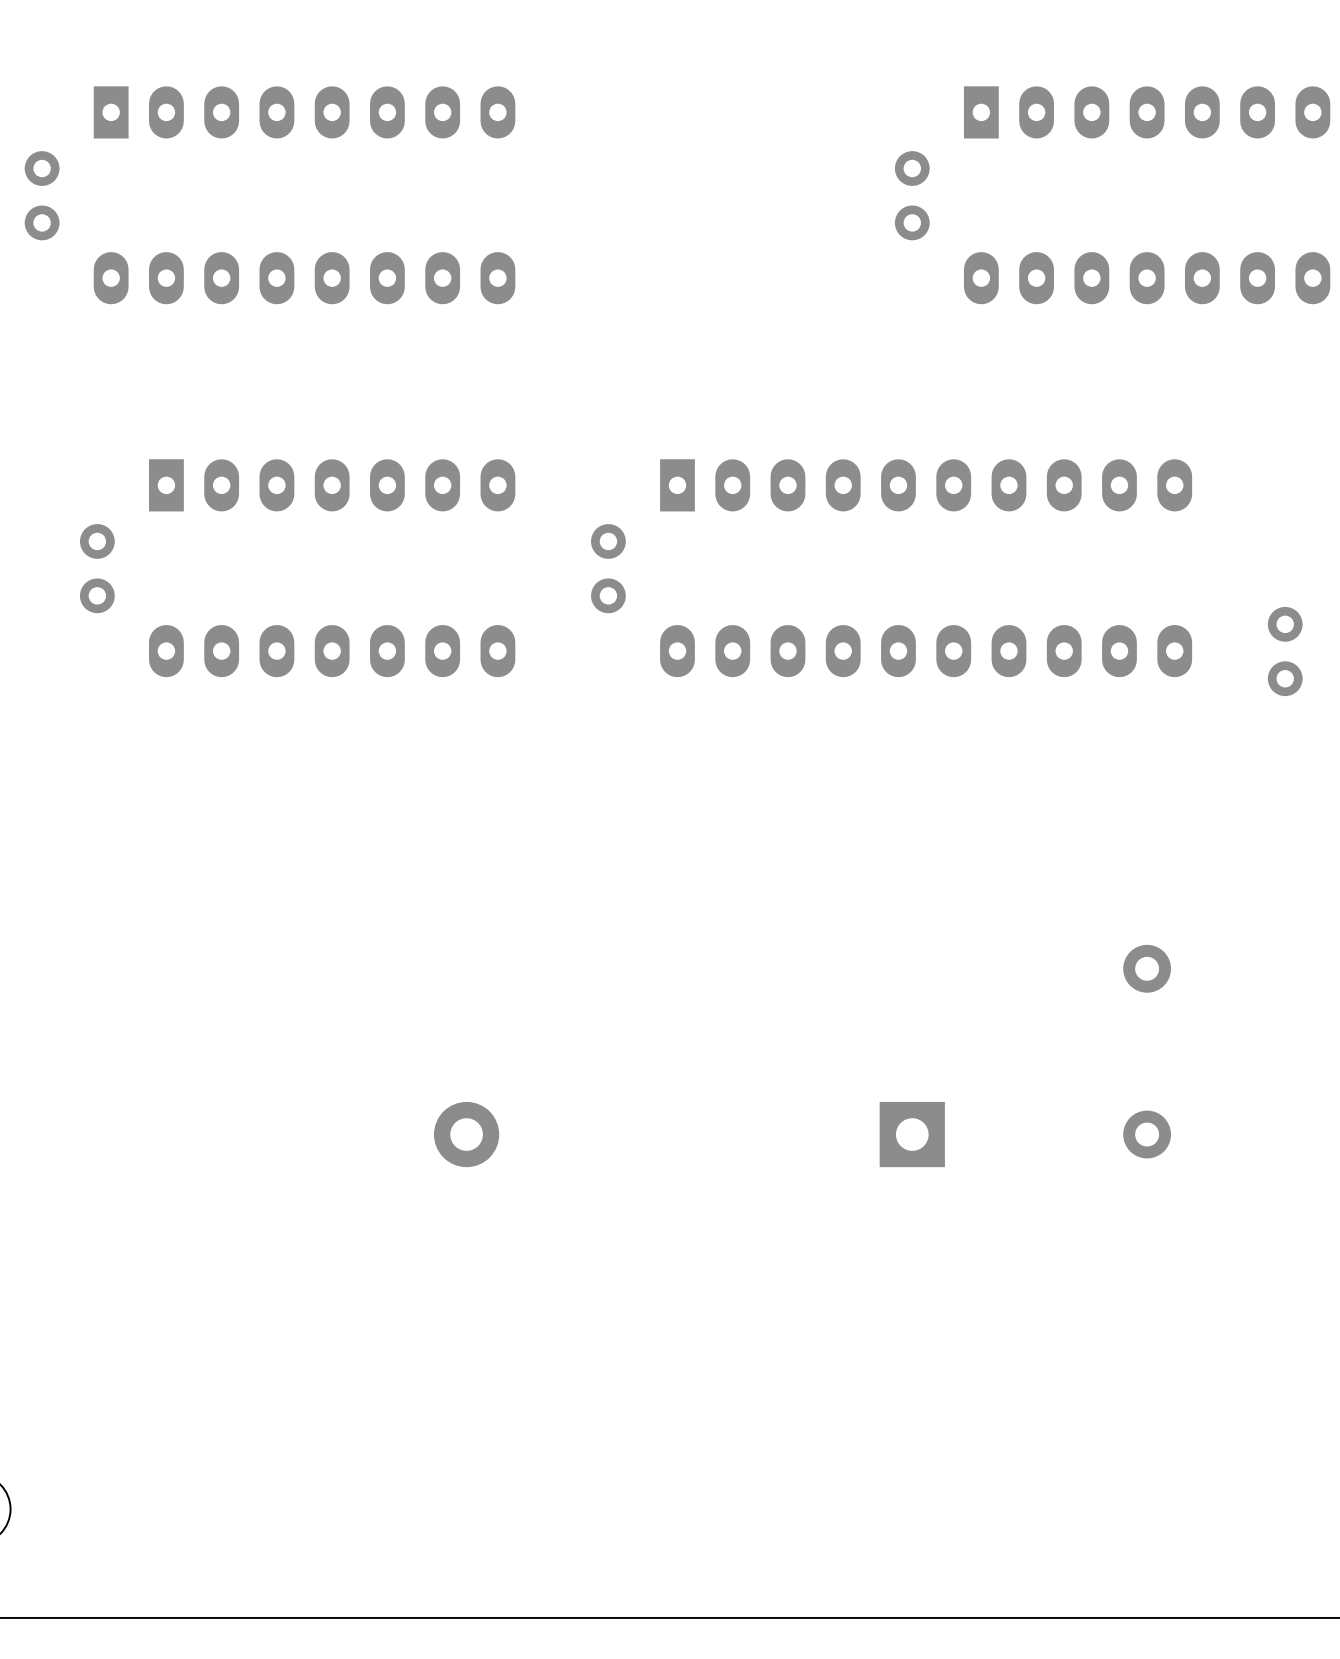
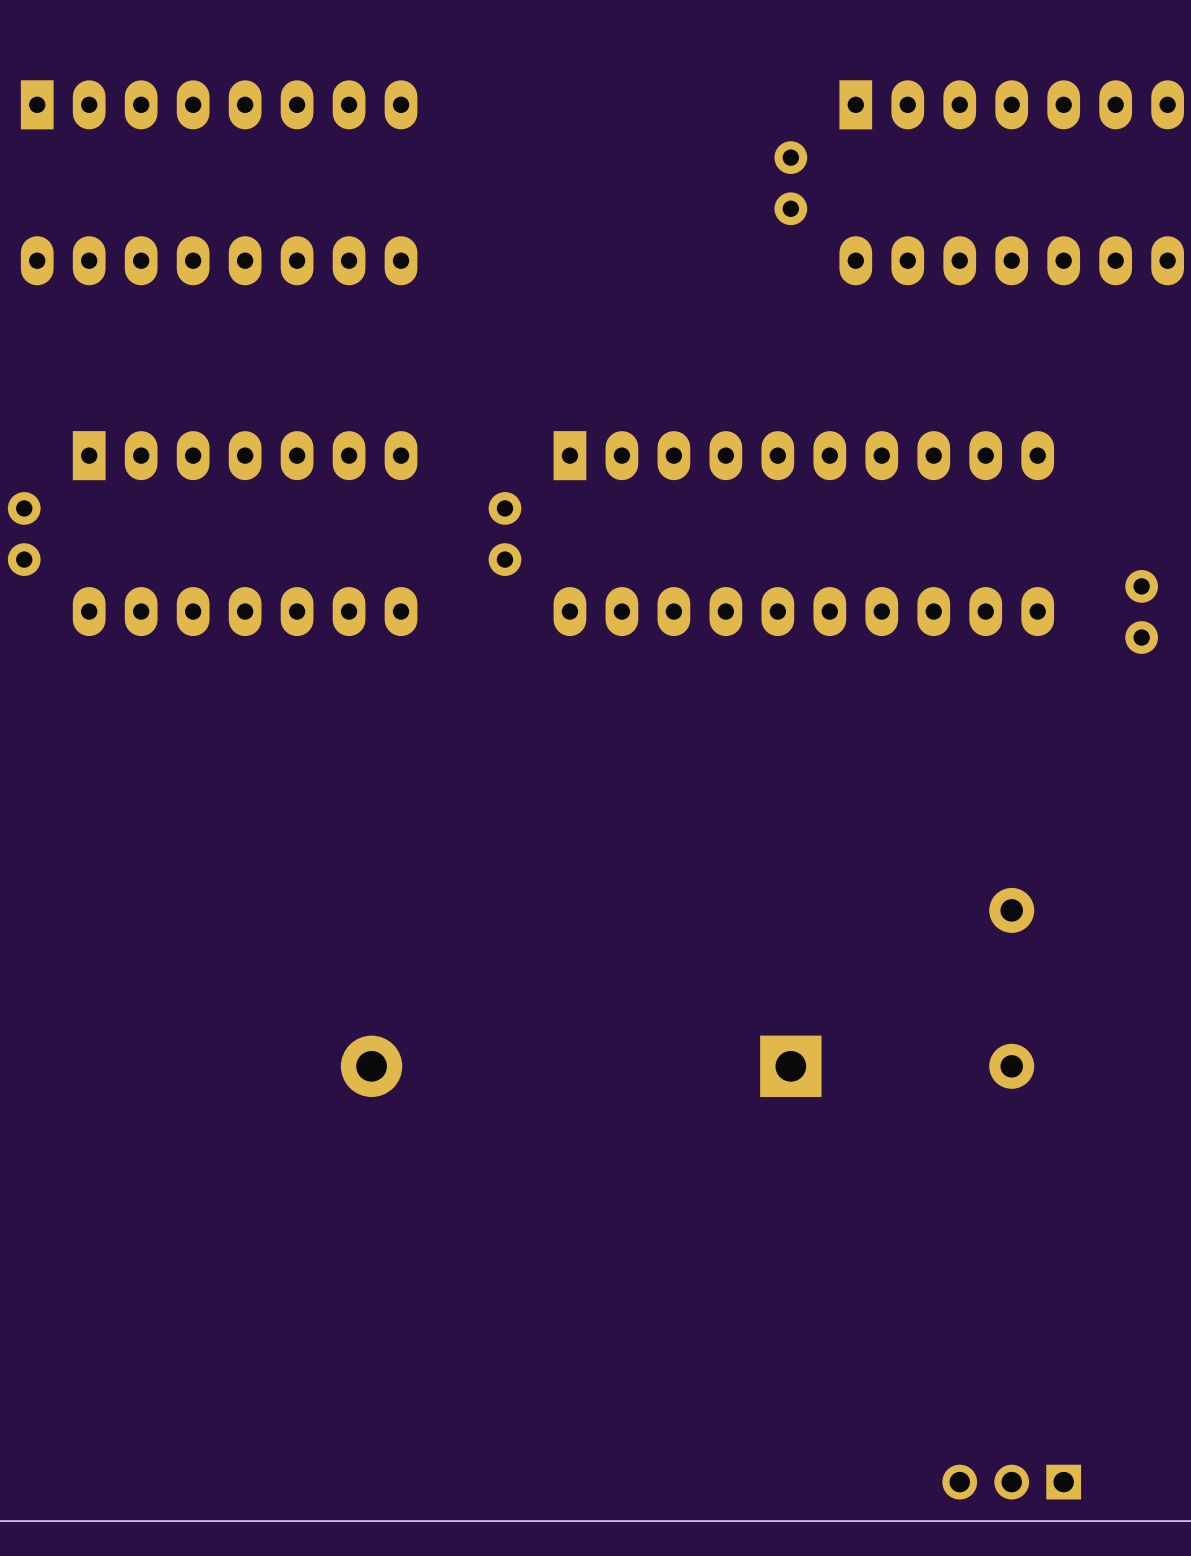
part: none -> (1011, 1482)

